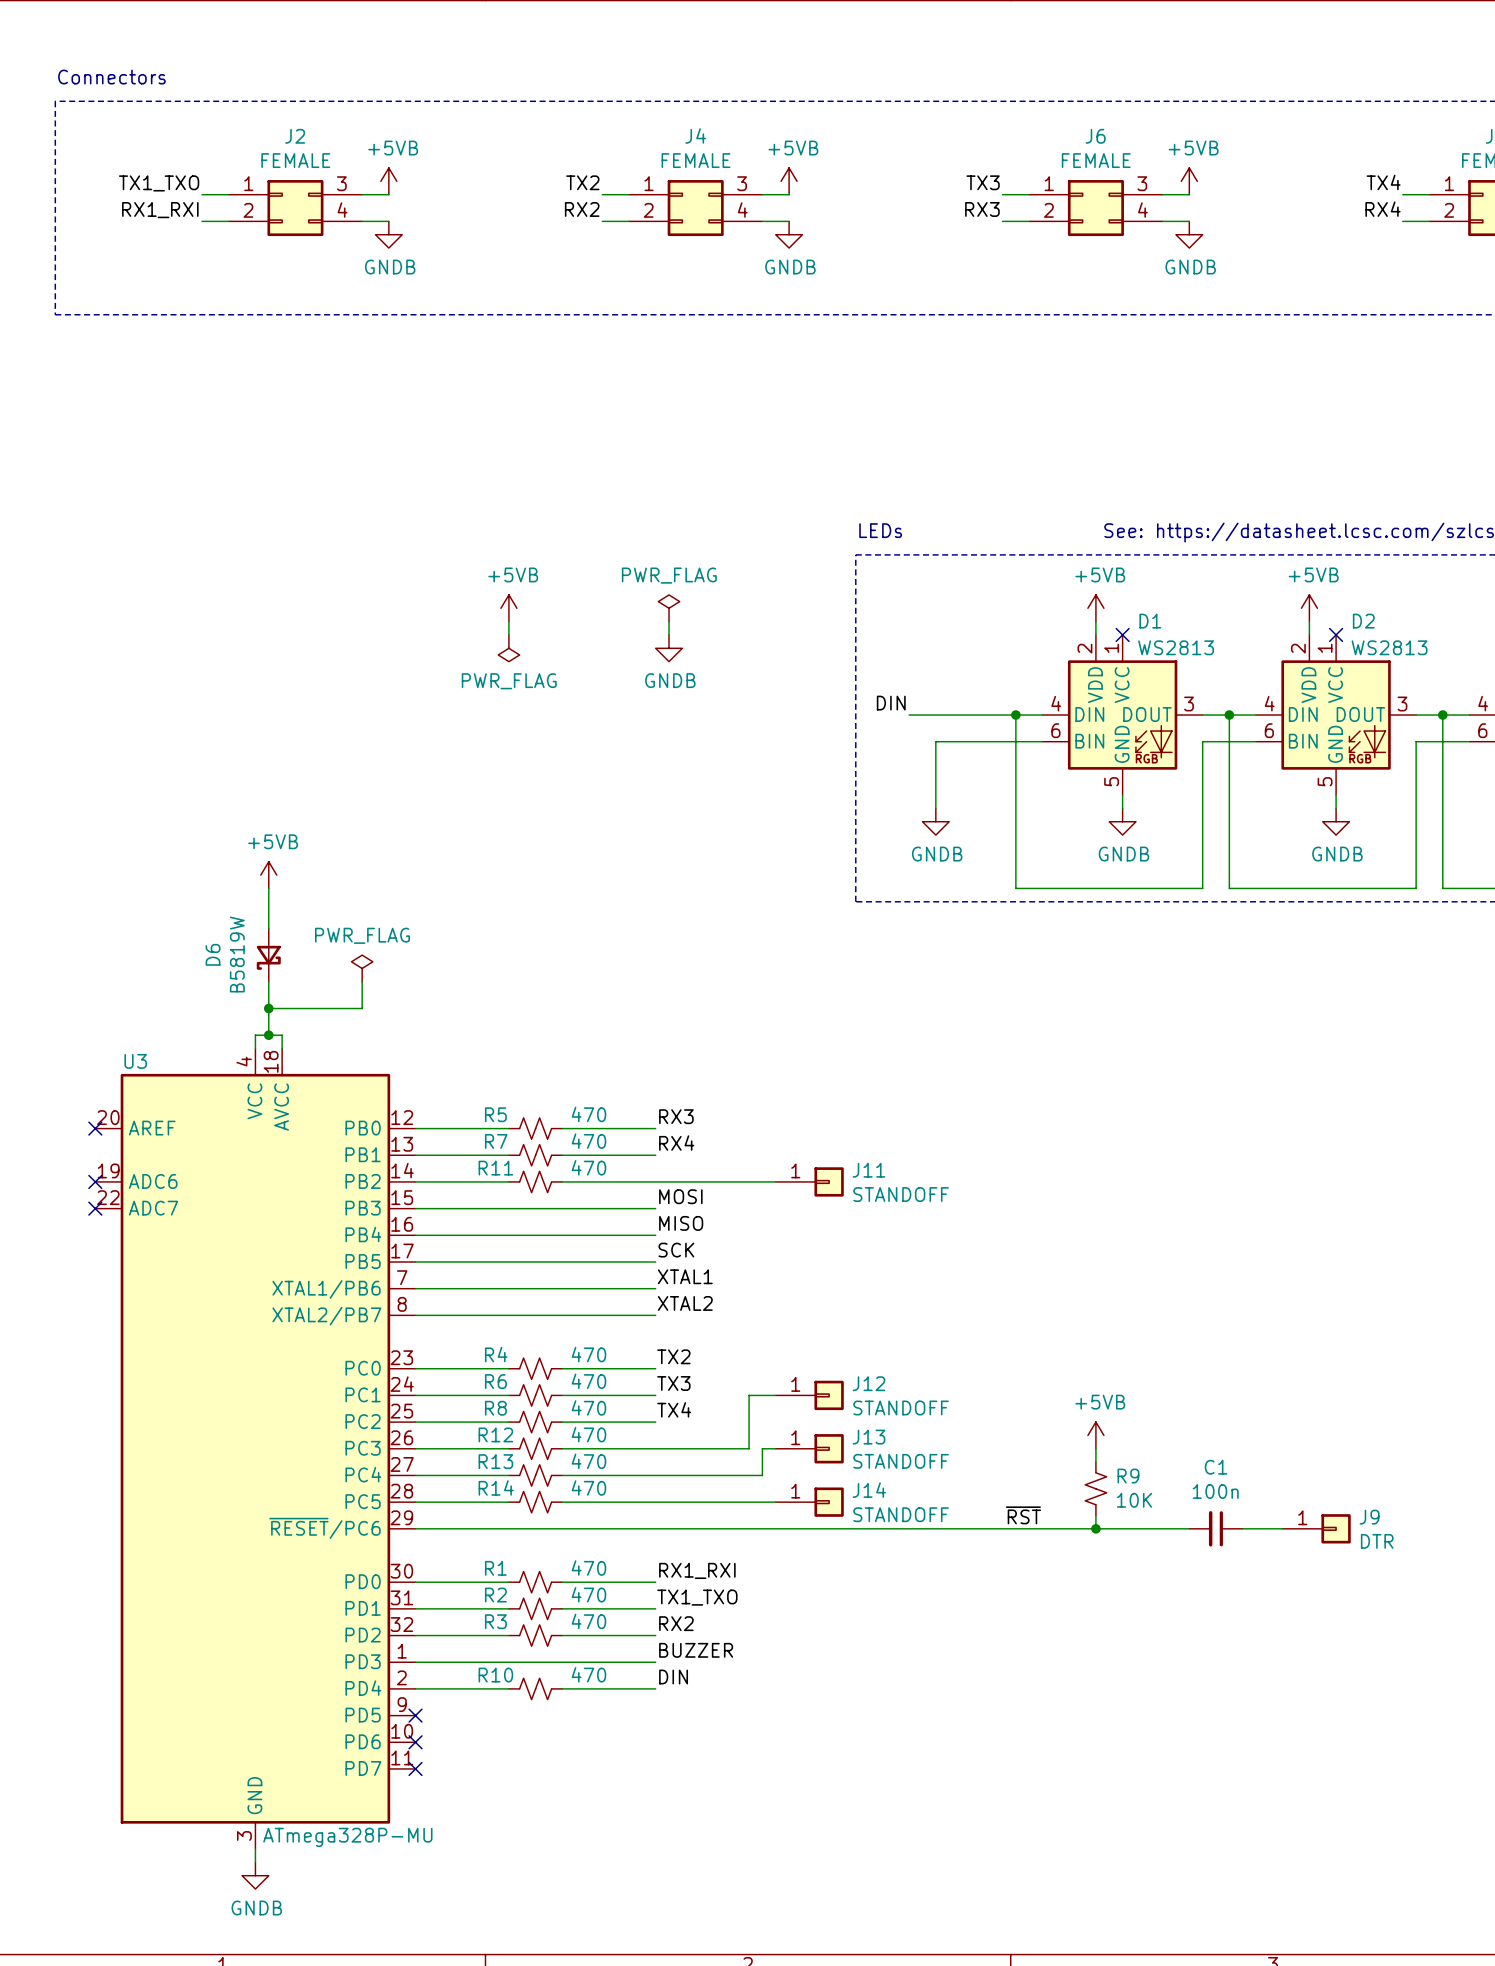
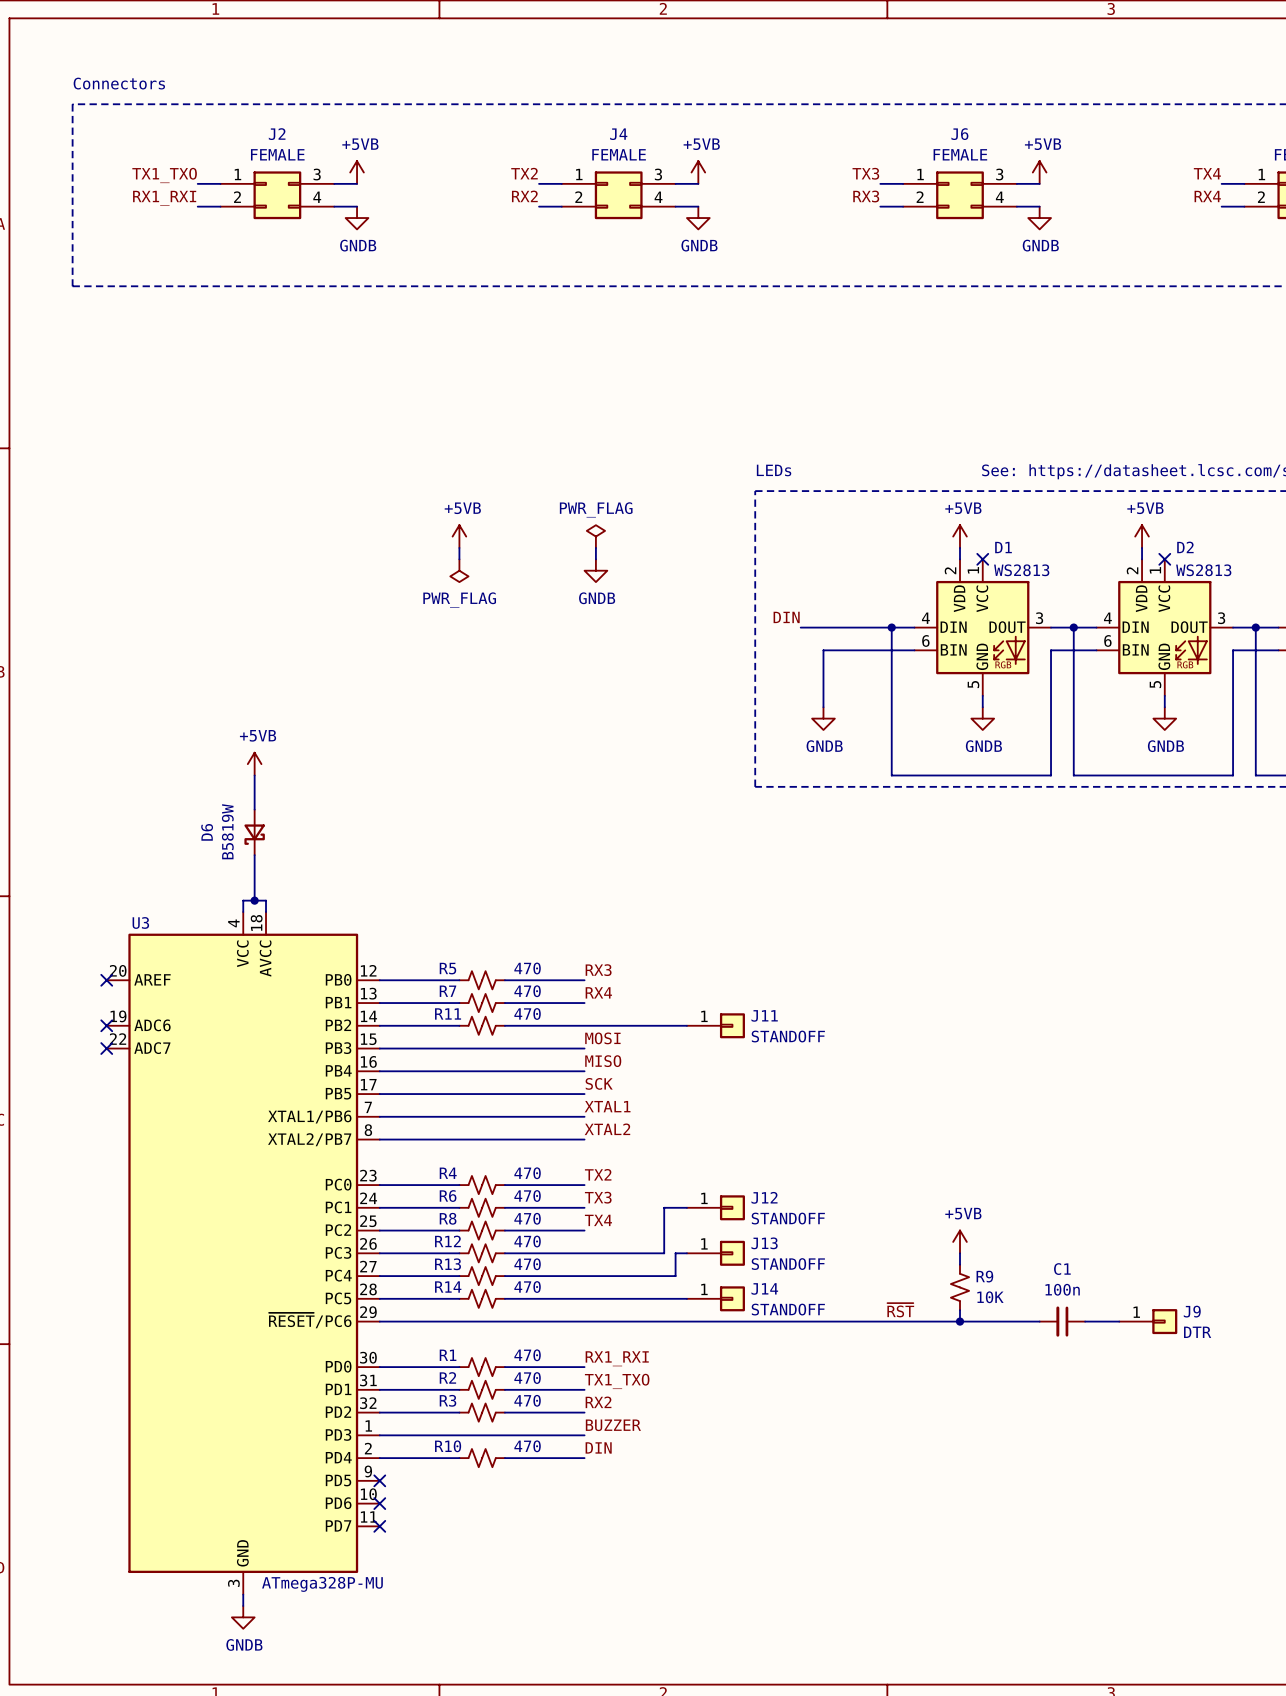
power symbol: PWR_FLAG (362, 968) -> none
wire: (362, 981) (362, 1008) (268, 1008) -> none
junction: (268, 1008) -> none

